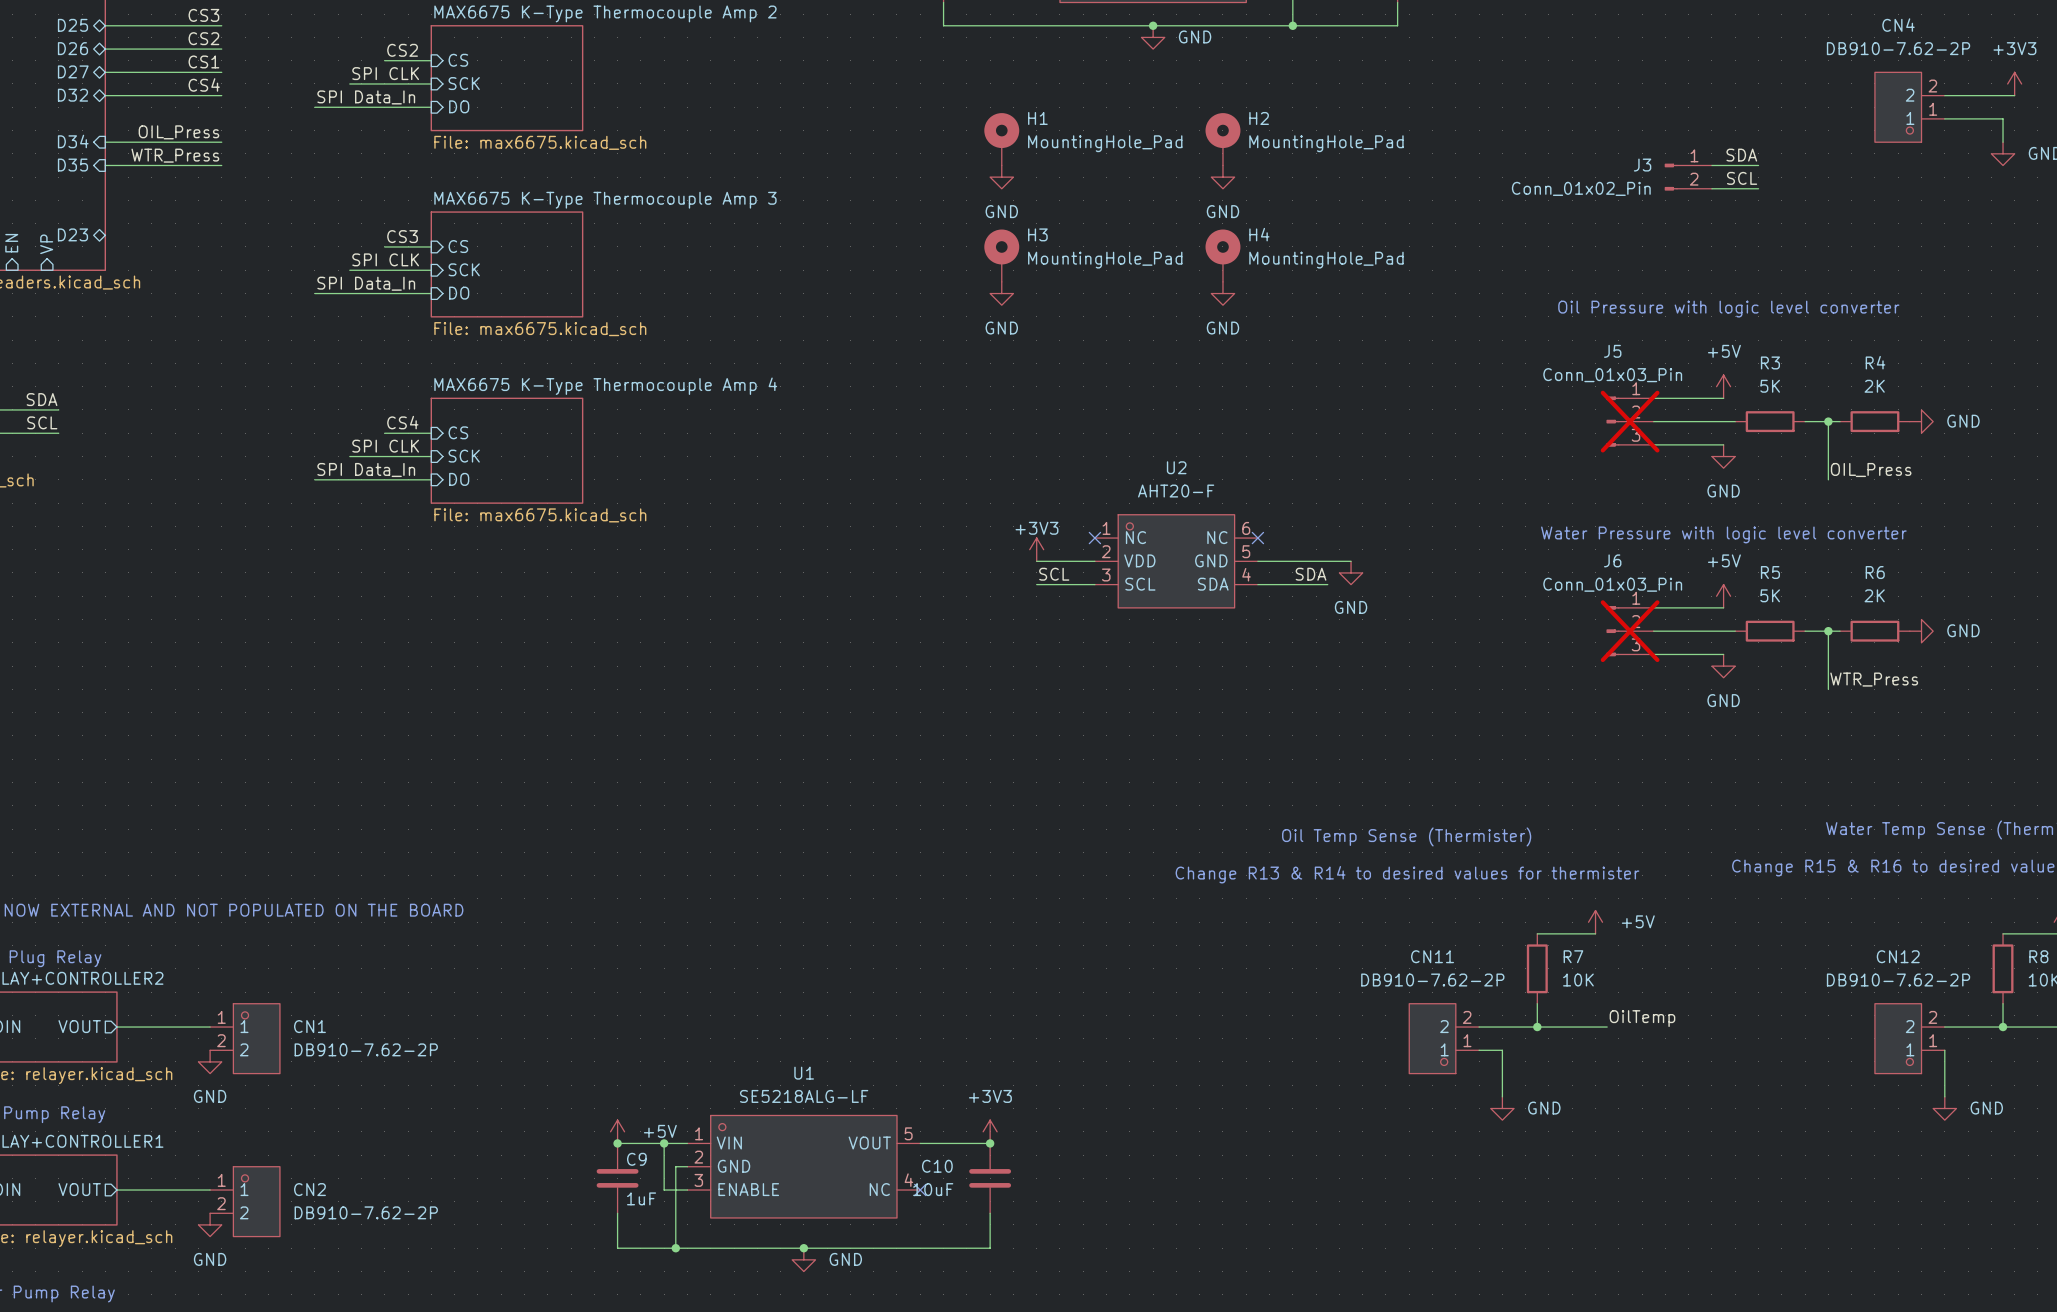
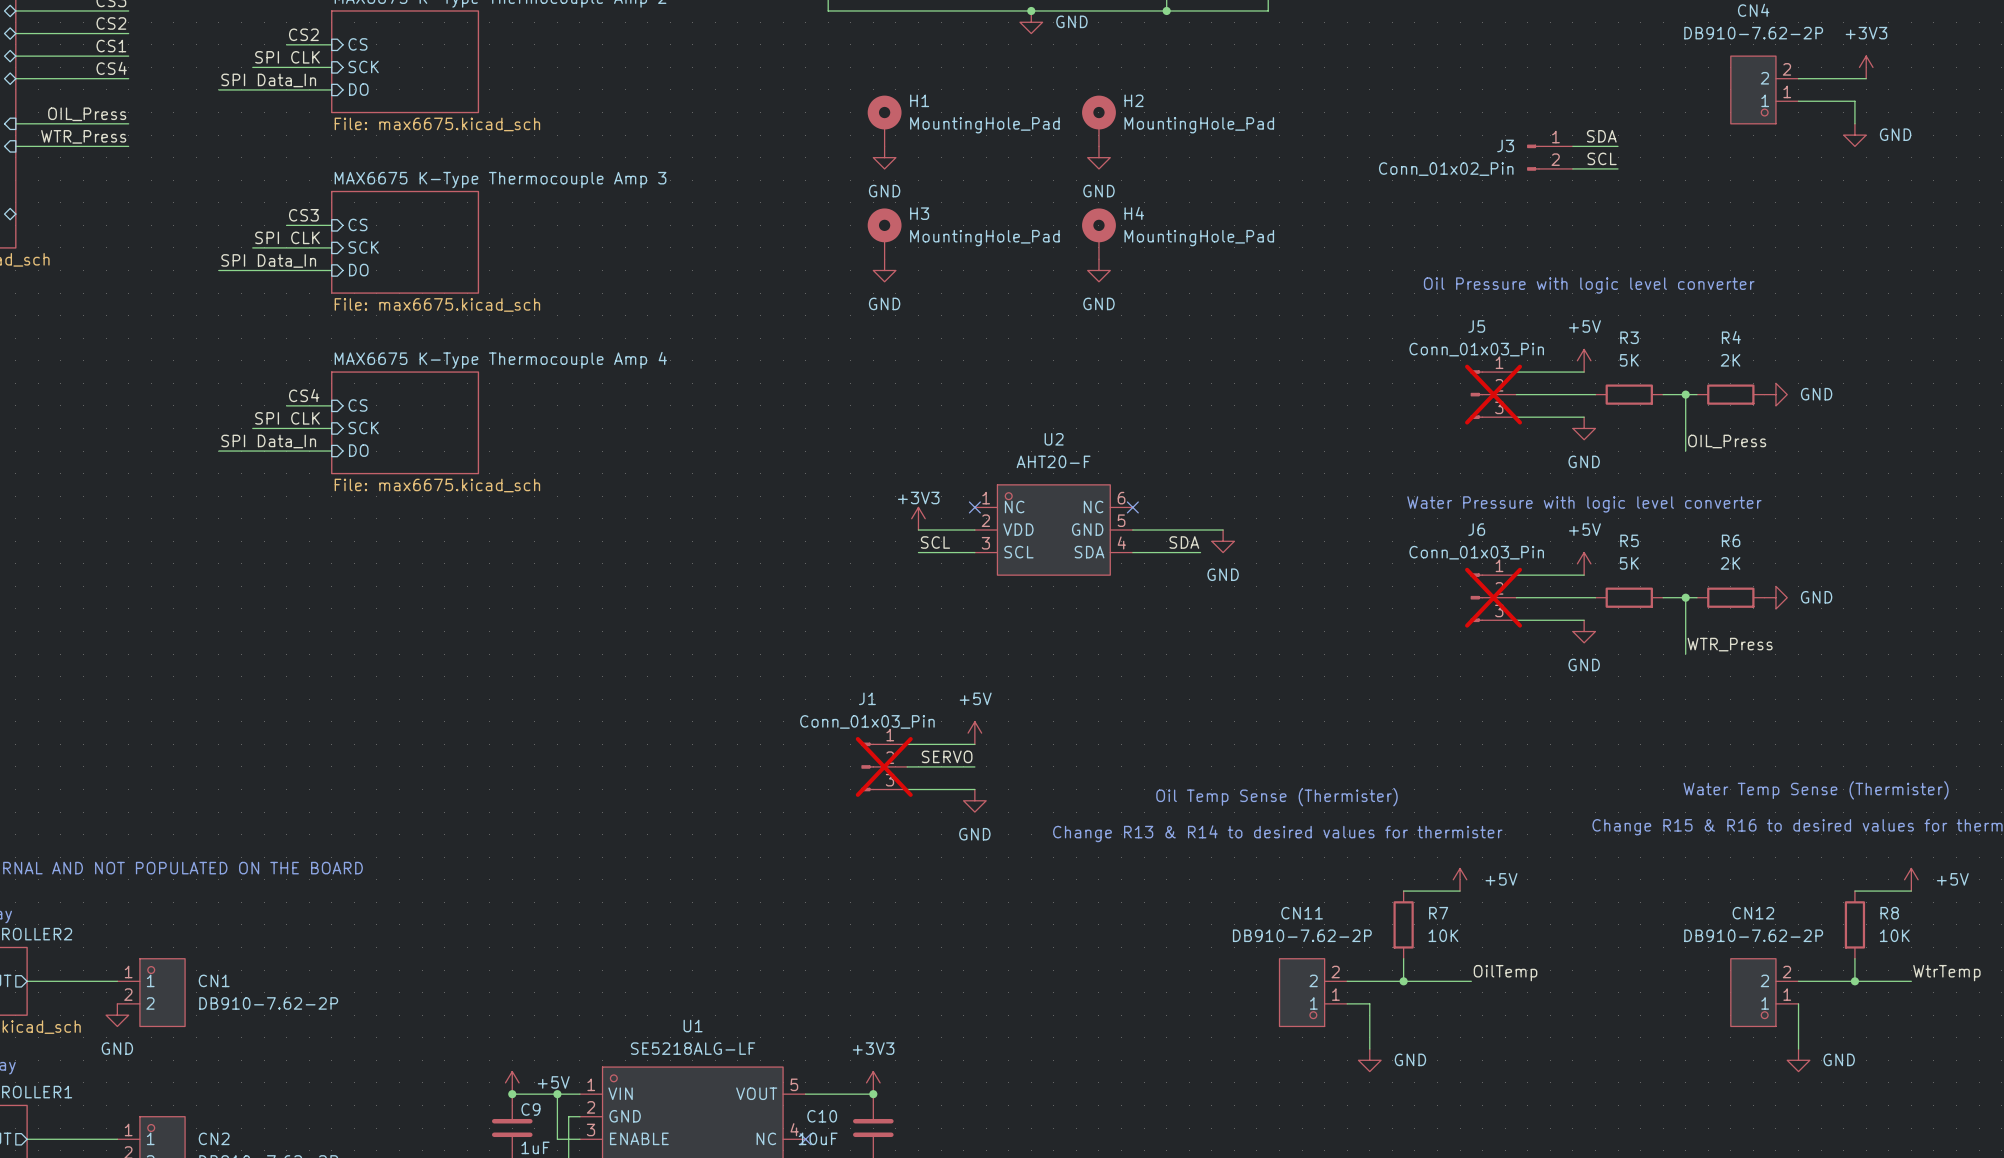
power symbol: none -> +5V (974, 733)
wire: none -> (907, 744) (974, 744)
label: none -> SERVO (947, 756)
J1: none -> Conn_01x03_Pin (884, 766)
wire: none -> (907, 766) (974, 766)
wire: none -> (907, 789) (974, 789)
power symbol: none -> GND (974, 800)

